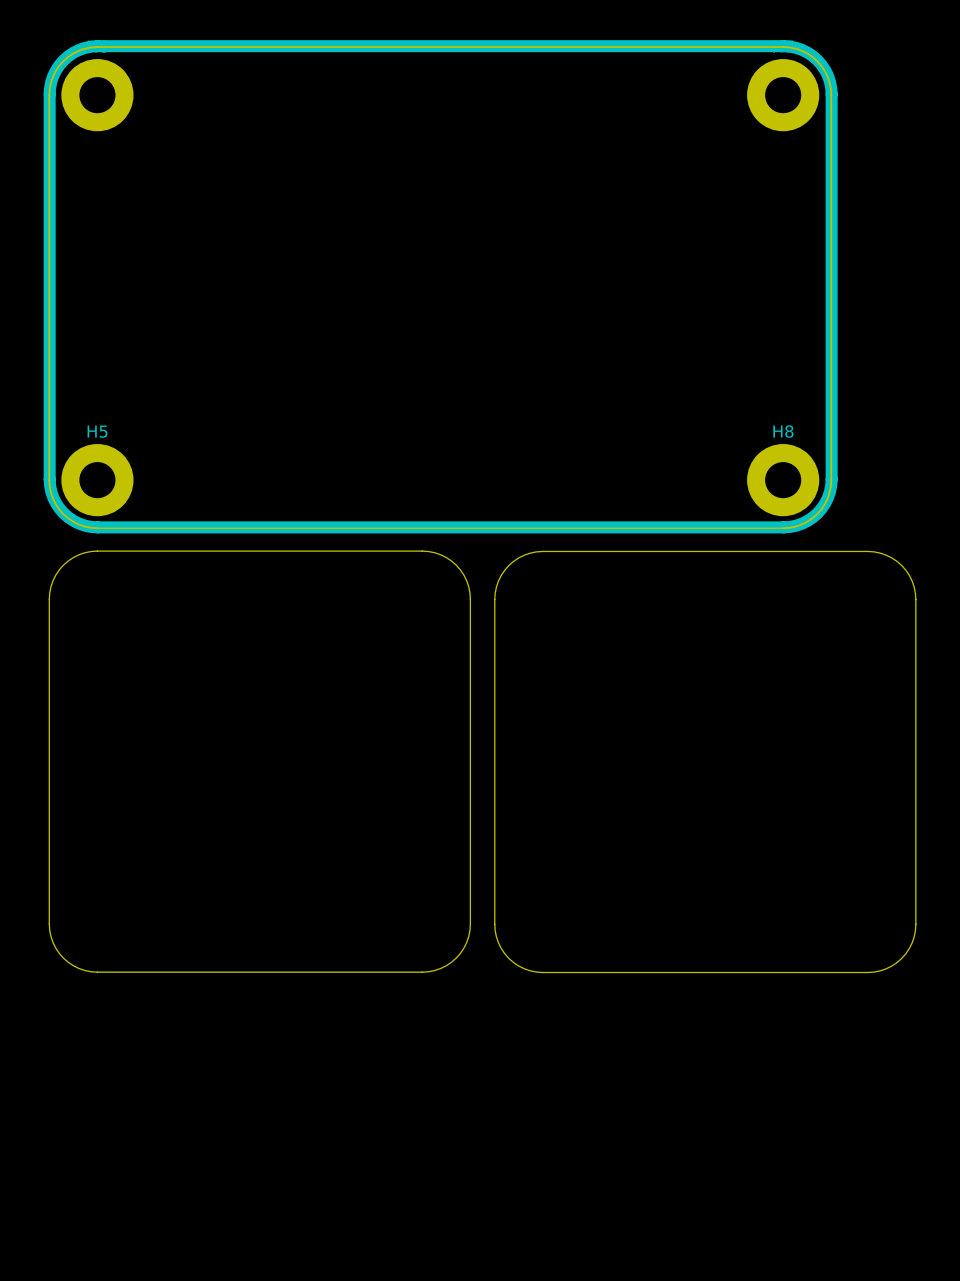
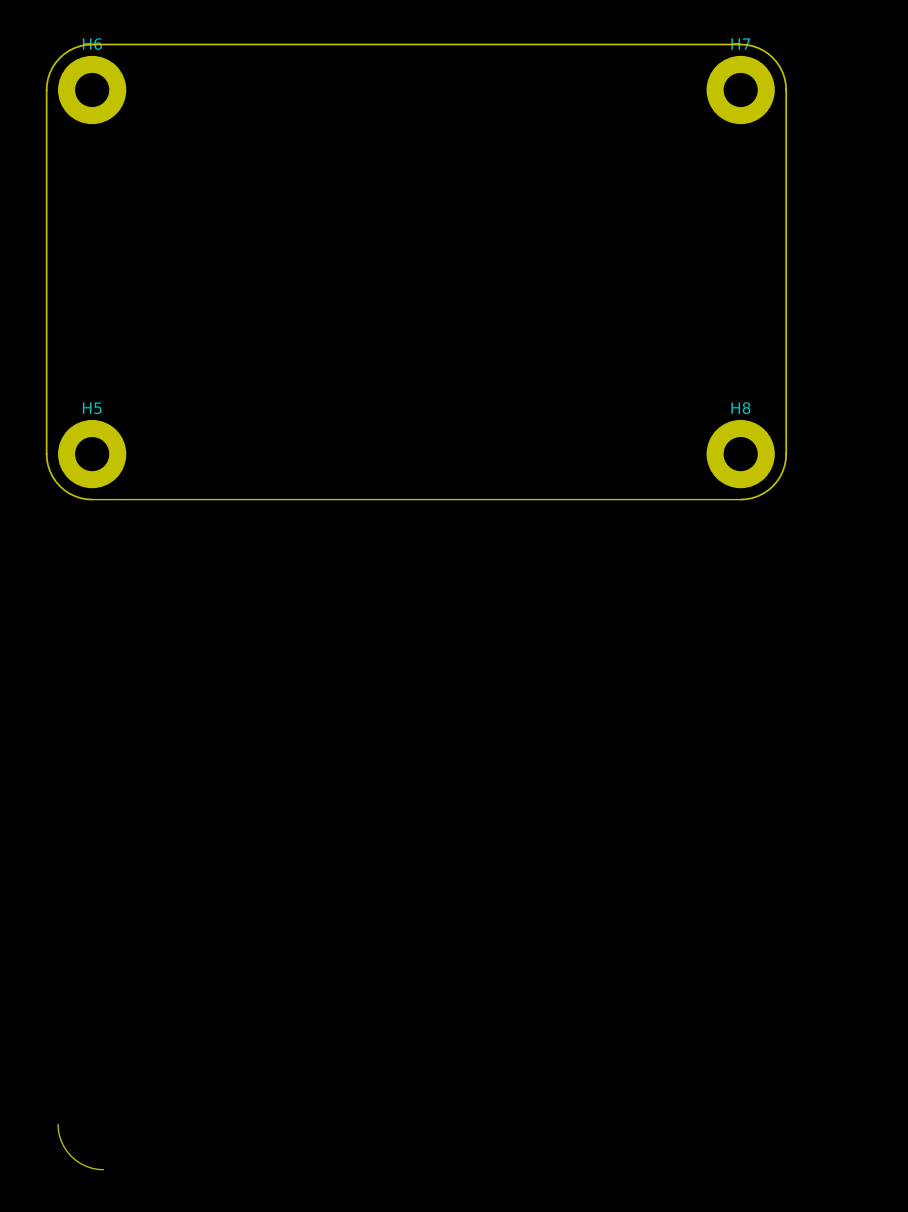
line: (97, 46) (783, 46) (795, 47) (807, 52) (817, 60) (825, 70) (830, 81) (831, 94) (831, 479) (830, 491) (825, 503) (817, 513) (807, 520) (795, 525) (783, 527) (97, 527) (85, 525) (73, 520) (63, 513) (56, 503) (51, 491) (49, 479) (49, 94) (53, 75) (63, 60) (79, 49) (97, 46) -> none
board edge: (97, 551) (422, 551) (440, 554) (451, 561) (460, 569) (466, 580) (470, 599) (470, 924) (466, 942) (460, 953) (451, 962) (440, 968) (422, 972) (97, 972) (84, 970) (73, 965) (59, 953) (52, 942) (49, 924) (49, 592) (52, 580) (63, 565) (79, 554) (97, 551) -> none
board edge: (542, 551) (867, 551) (886, 555) (897, 561) (905, 570) (914, 587) (915, 599) (915, 924) (912, 942) (905, 953) (897, 962) (886, 968) (867, 972) (542, 972) (530, 970) (518, 966) (504, 953) (496, 936) (494, 924) (495, 593) (501, 575) (508, 565) (524, 555) (542, 551) -> none
board edge: none -> (58, 1124) (61, 1141) (71, 1156) (86, 1166) (103, 1169)

